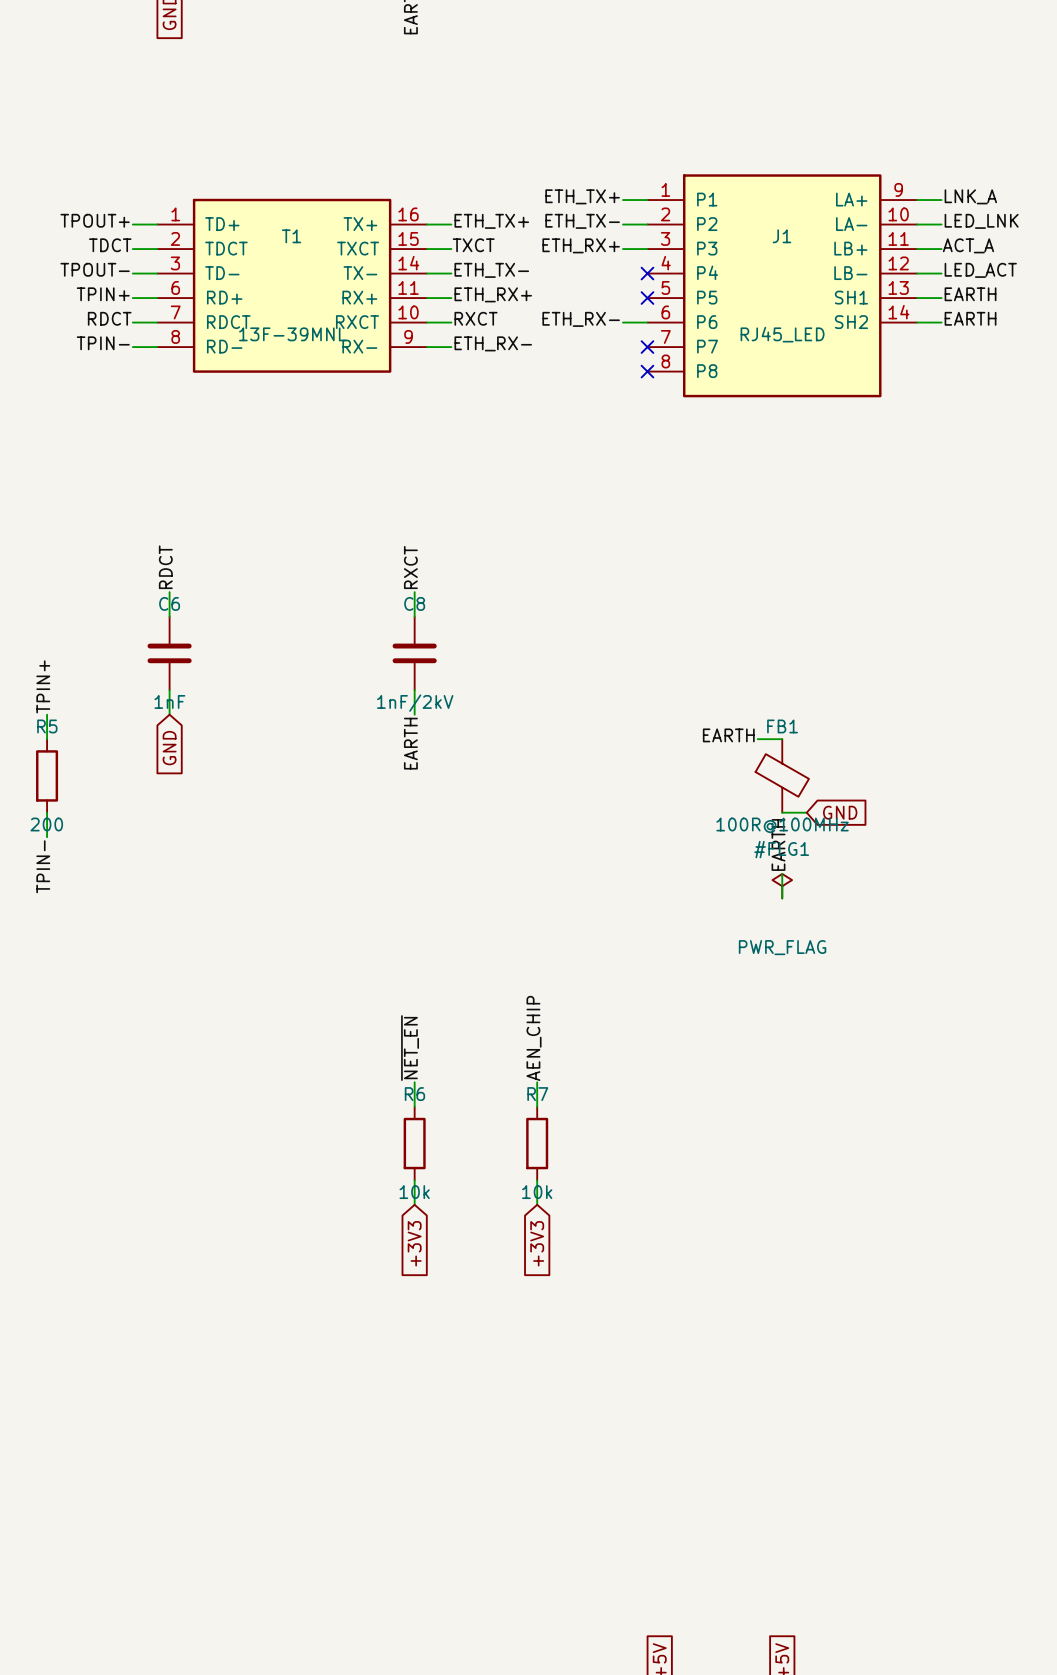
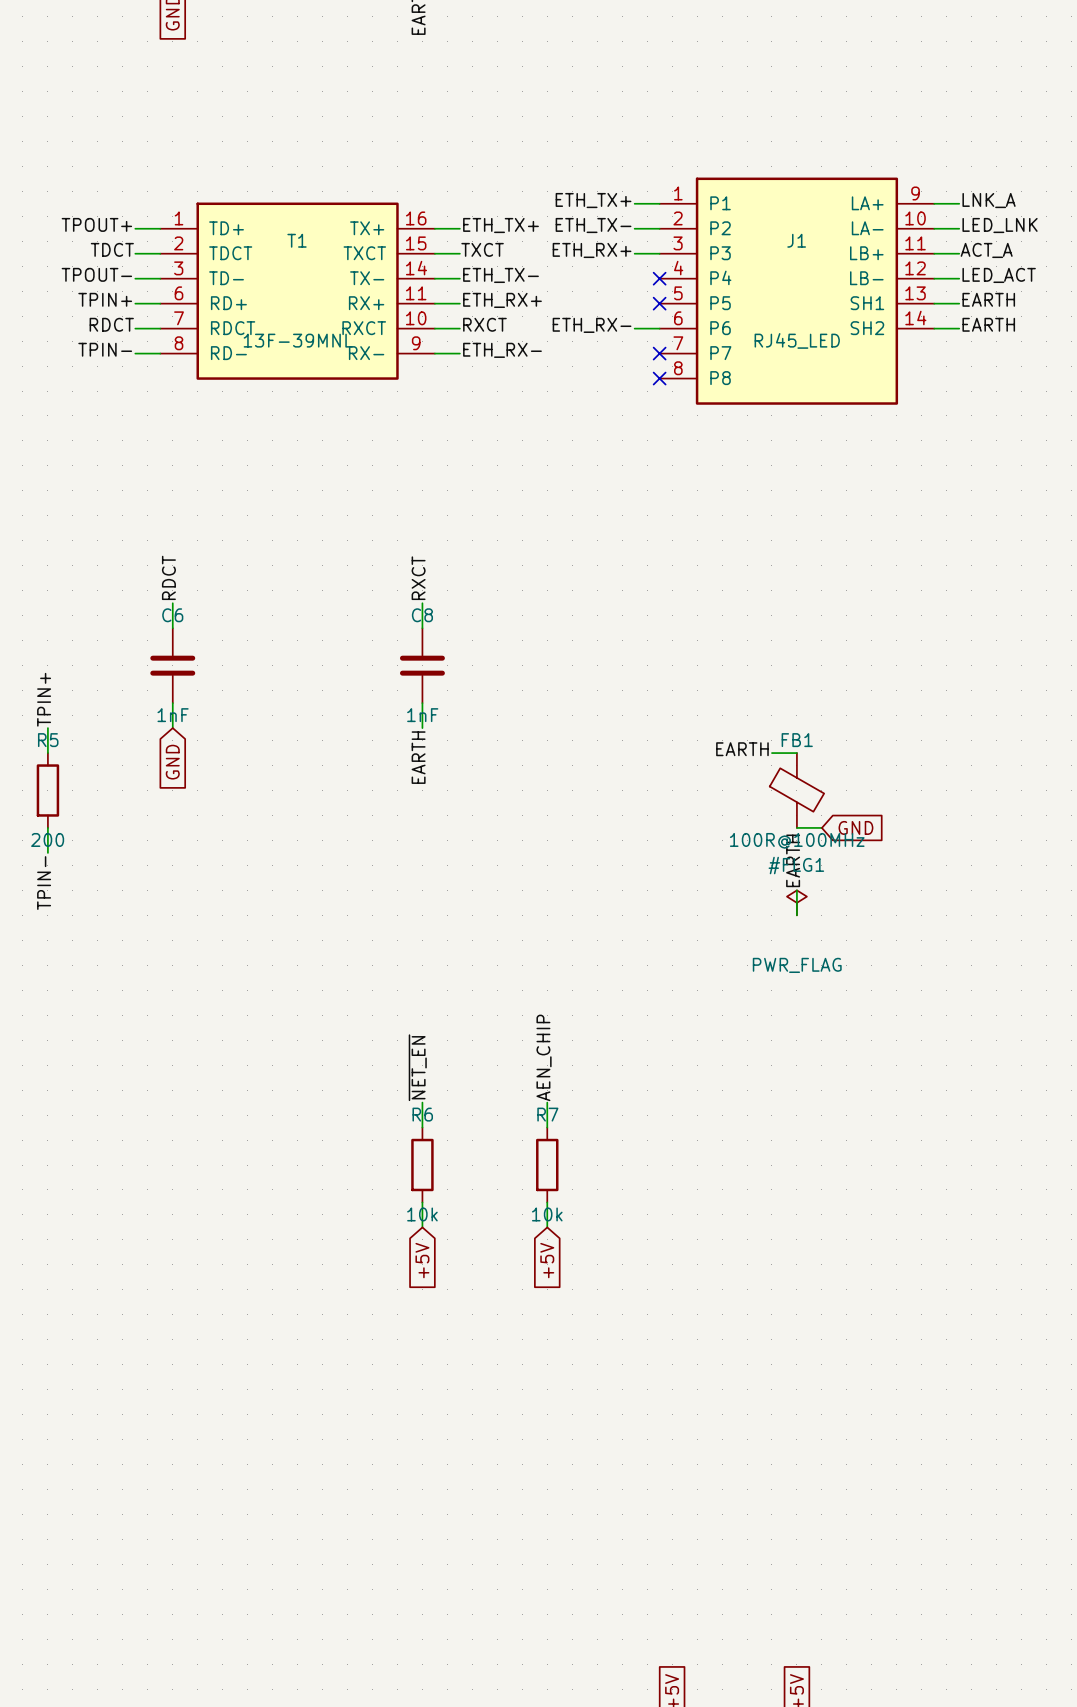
C8 value: 1nF/2kV (415, 703) -> 1nF (422, 715)
global label: +3V3 (414, 1243) -> +5V (422, 1260)
global label: +3V3 (537, 1243) -> +5V (547, 1260)

